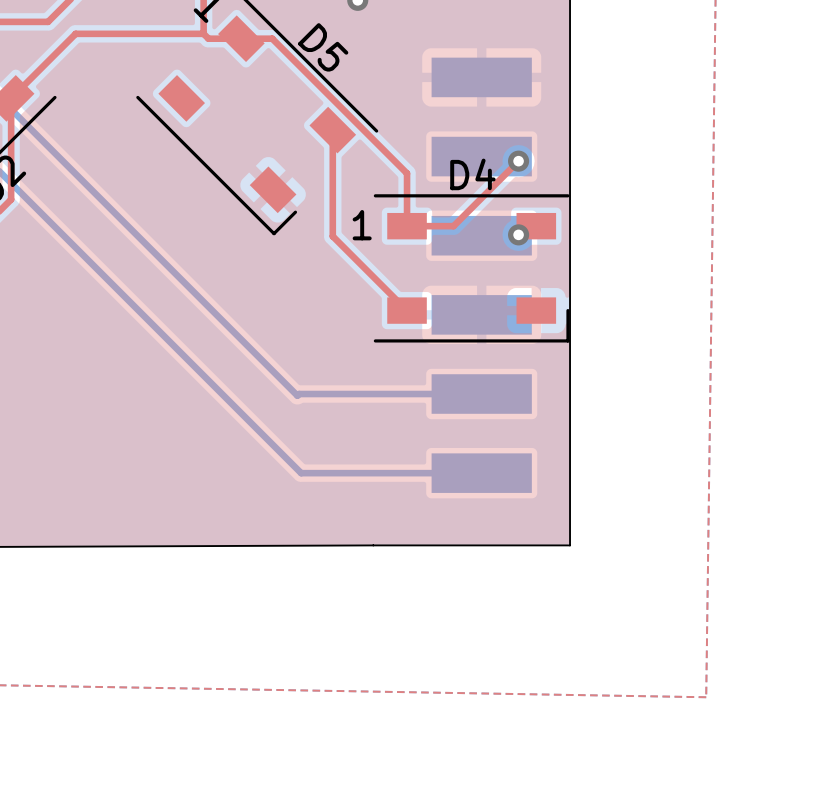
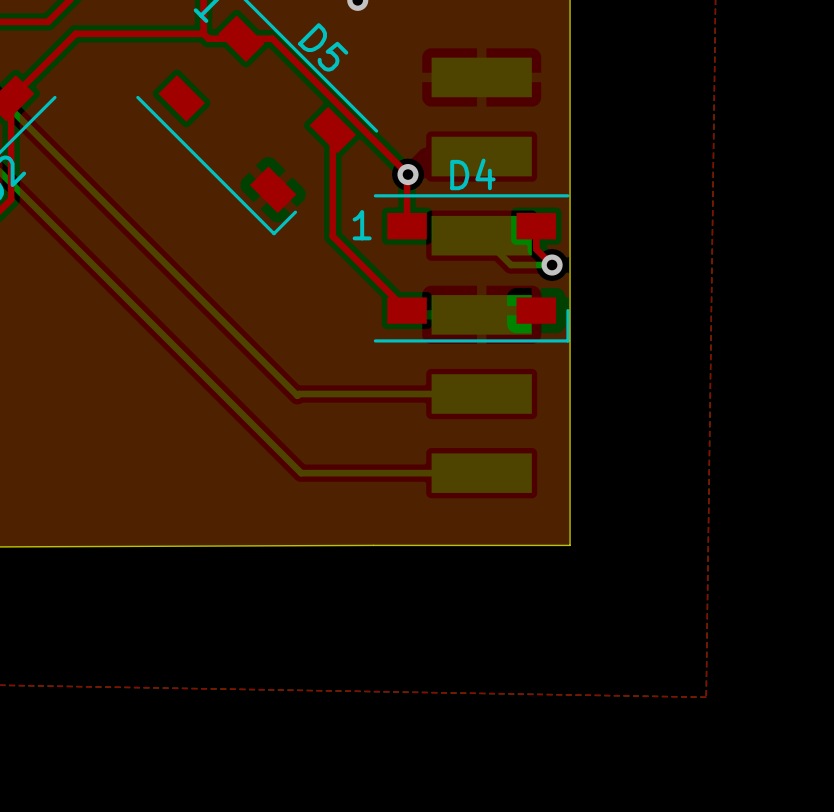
top track: (518, 161) (453, 226) (407, 226) -> none
via: (518, 161) -> none
via: none -> (408, 174)
top track: none -> (536, 226) (536, 249) (552, 265)
via position: (518, 234) -> (552, 265)
bottom track: none -> (481, 235) (511, 265) (552, 265)

